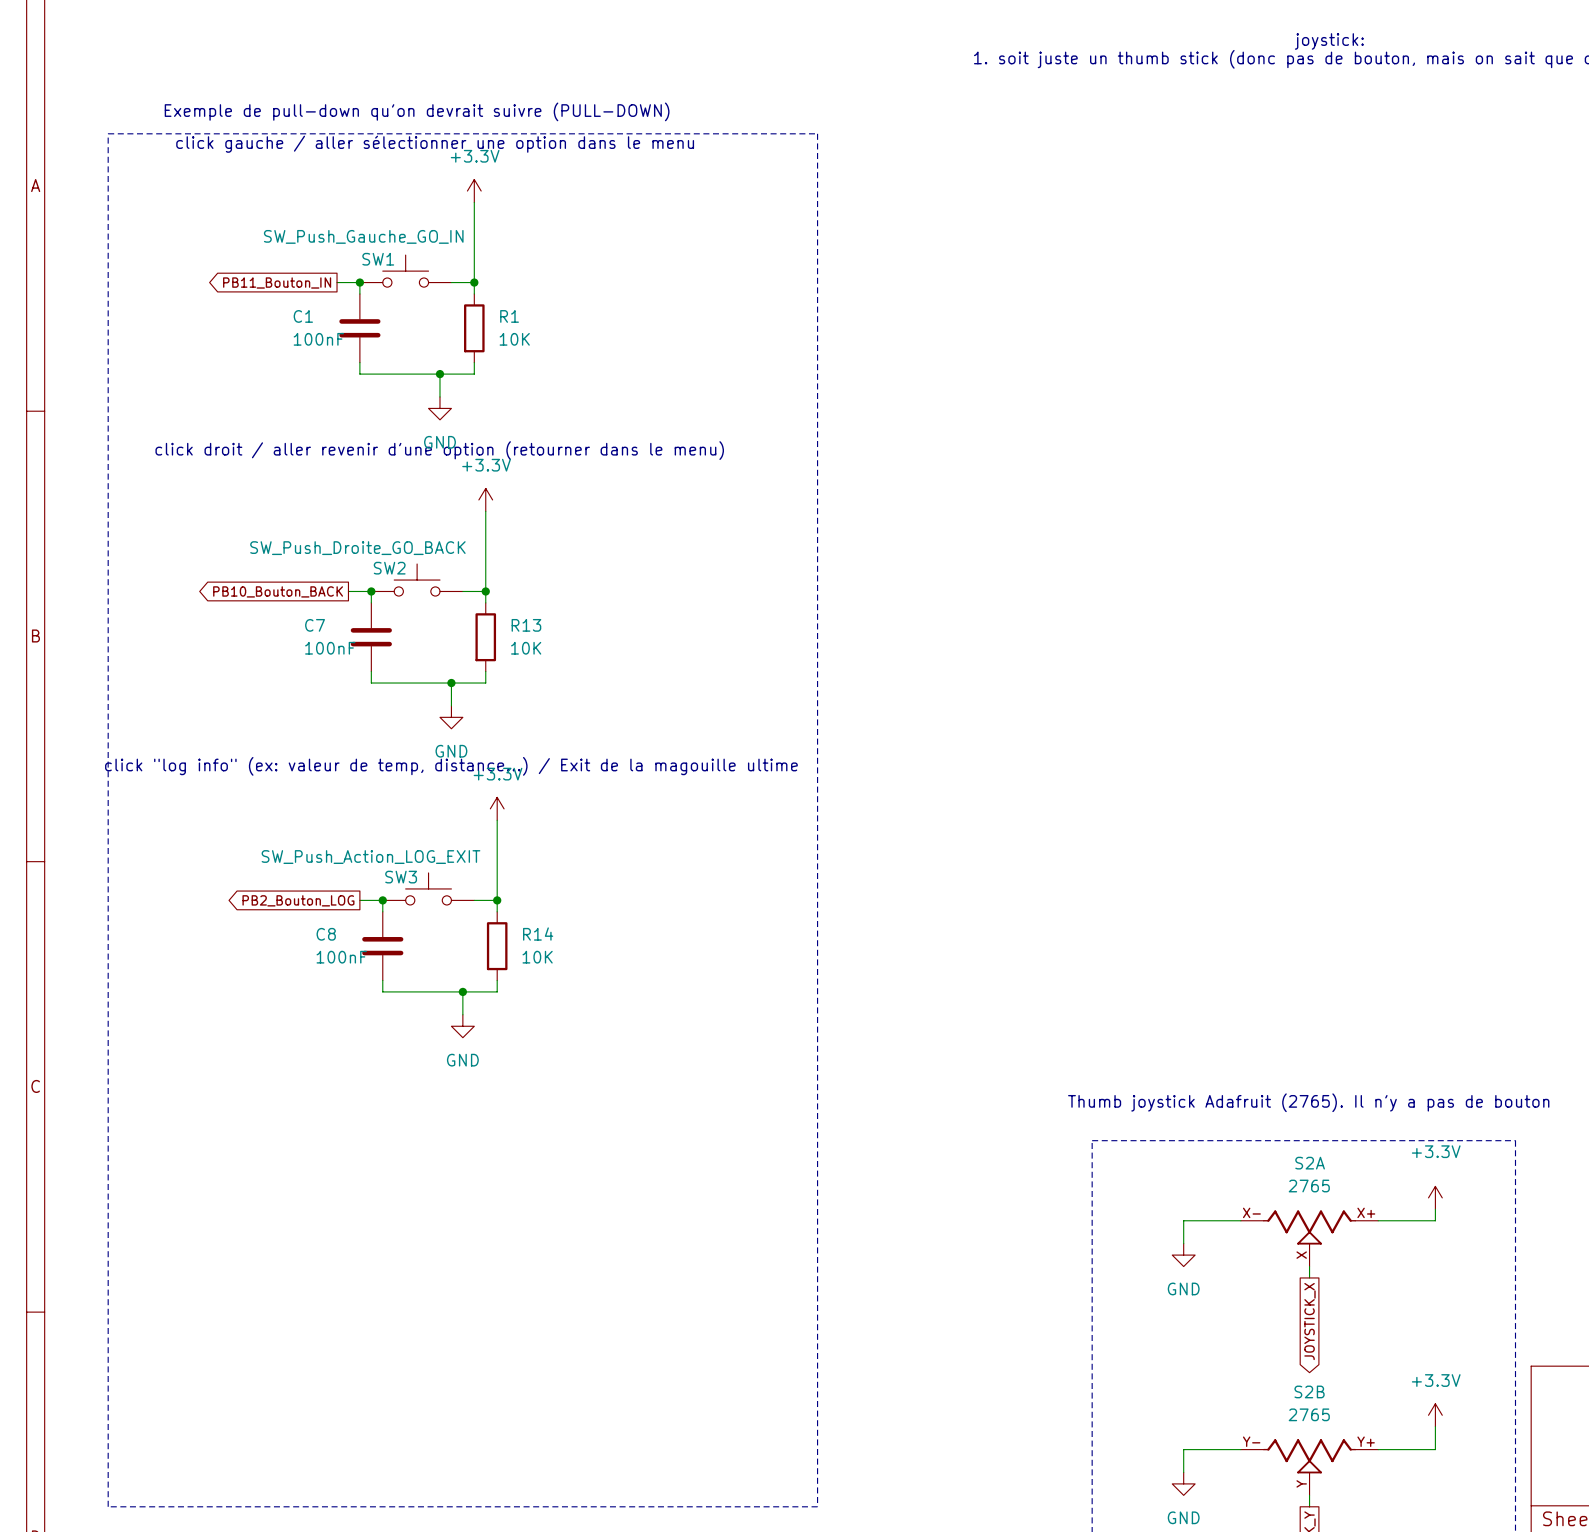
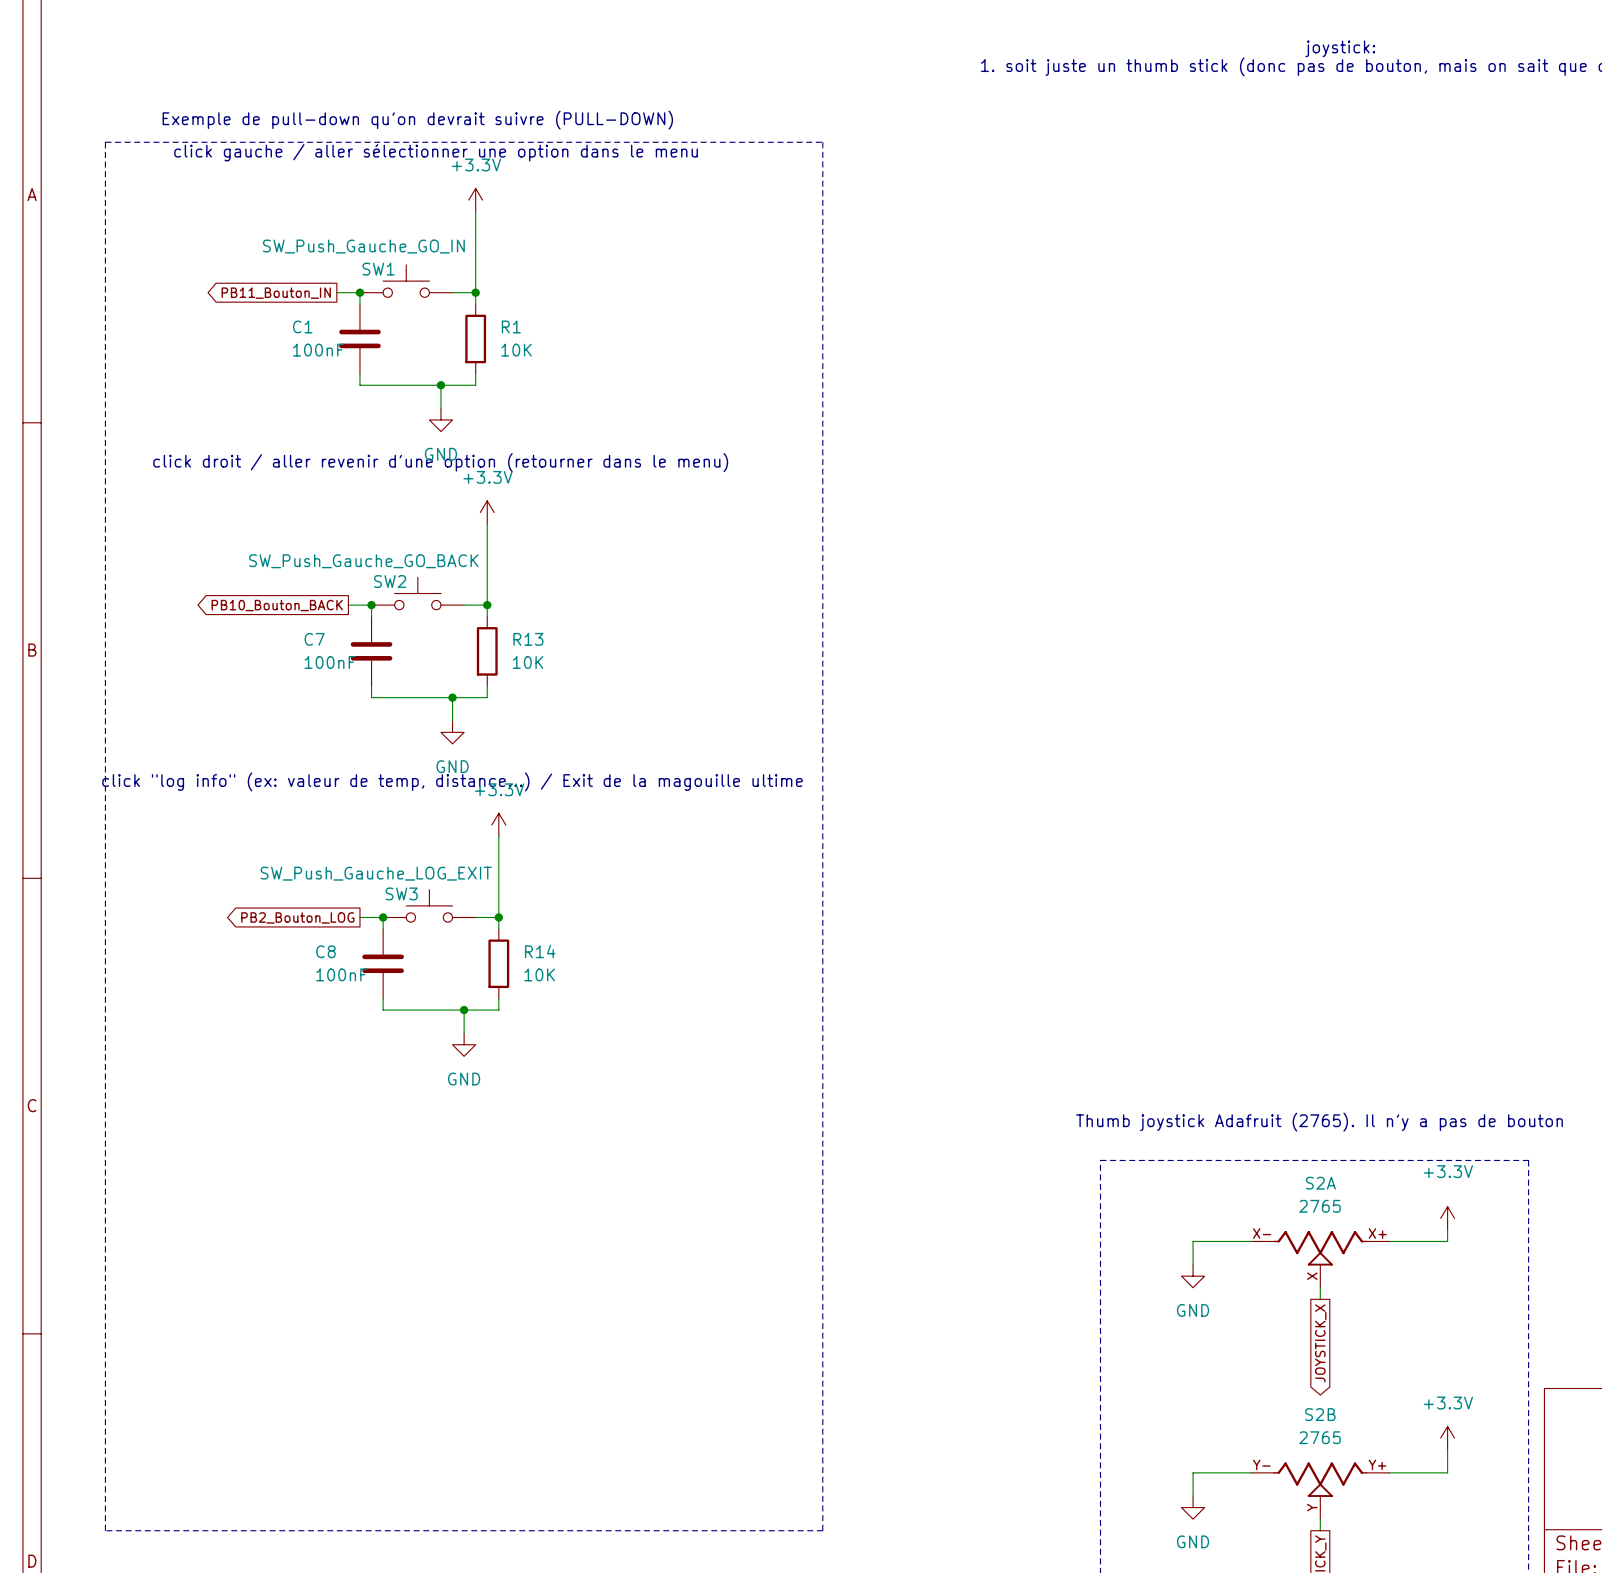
SW2 value: SW_Push_Droite_GO_BACK (357, 548) -> SW_Push_Gauche_GO_BACK (363, 561)
SW3 value: SW_Push_Action_LOG_EXIT (370, 857) -> SW_Push_Gauche_LOG_EXIT (376, 873)

